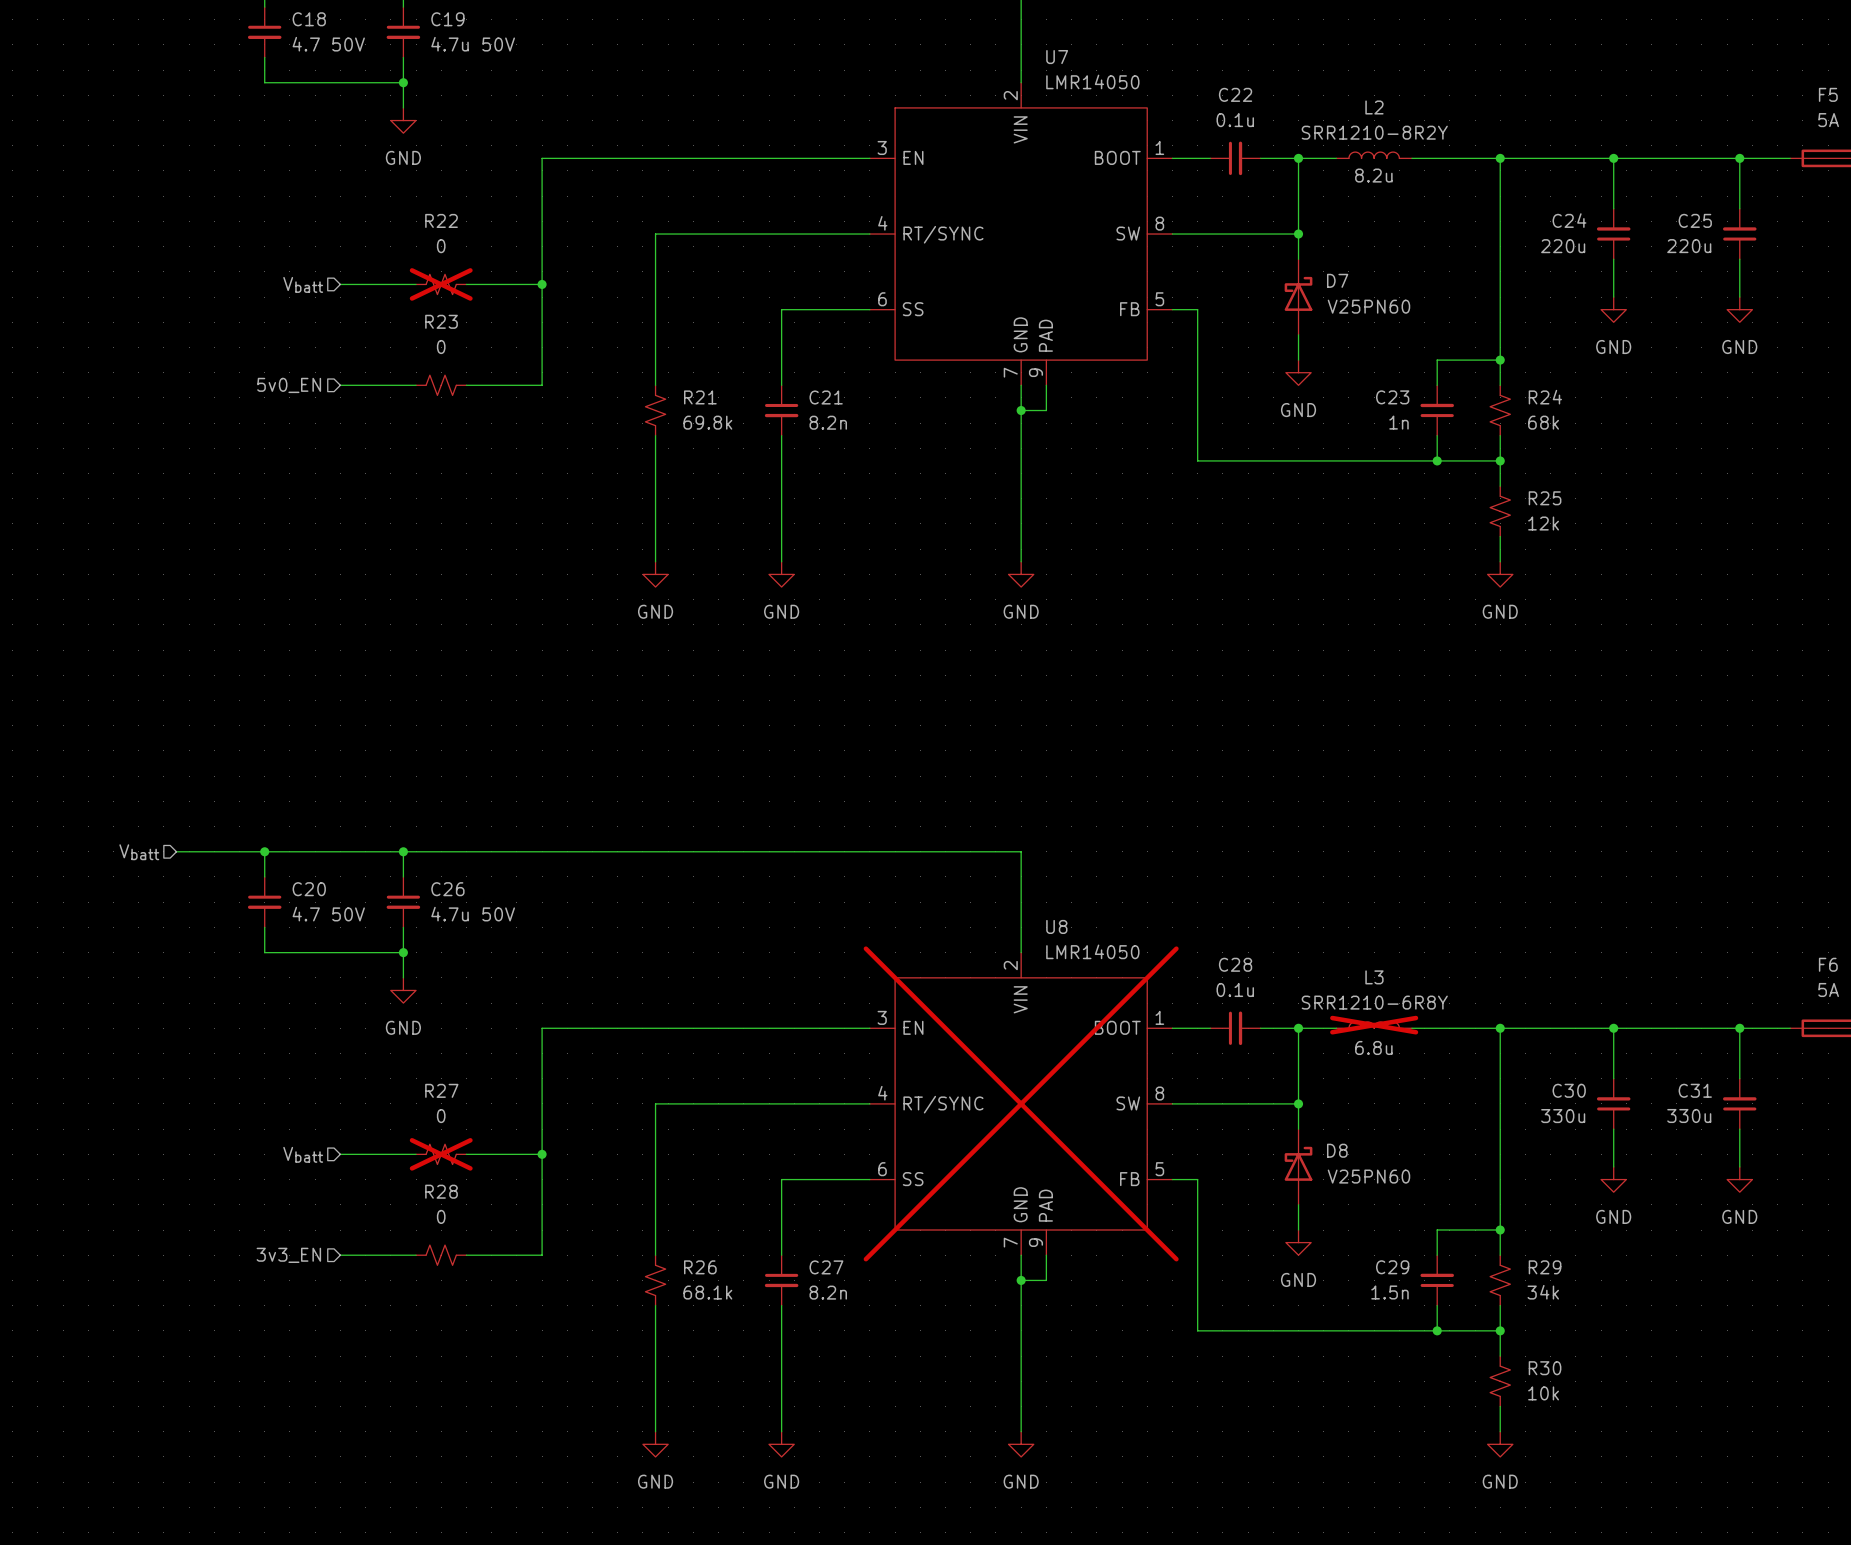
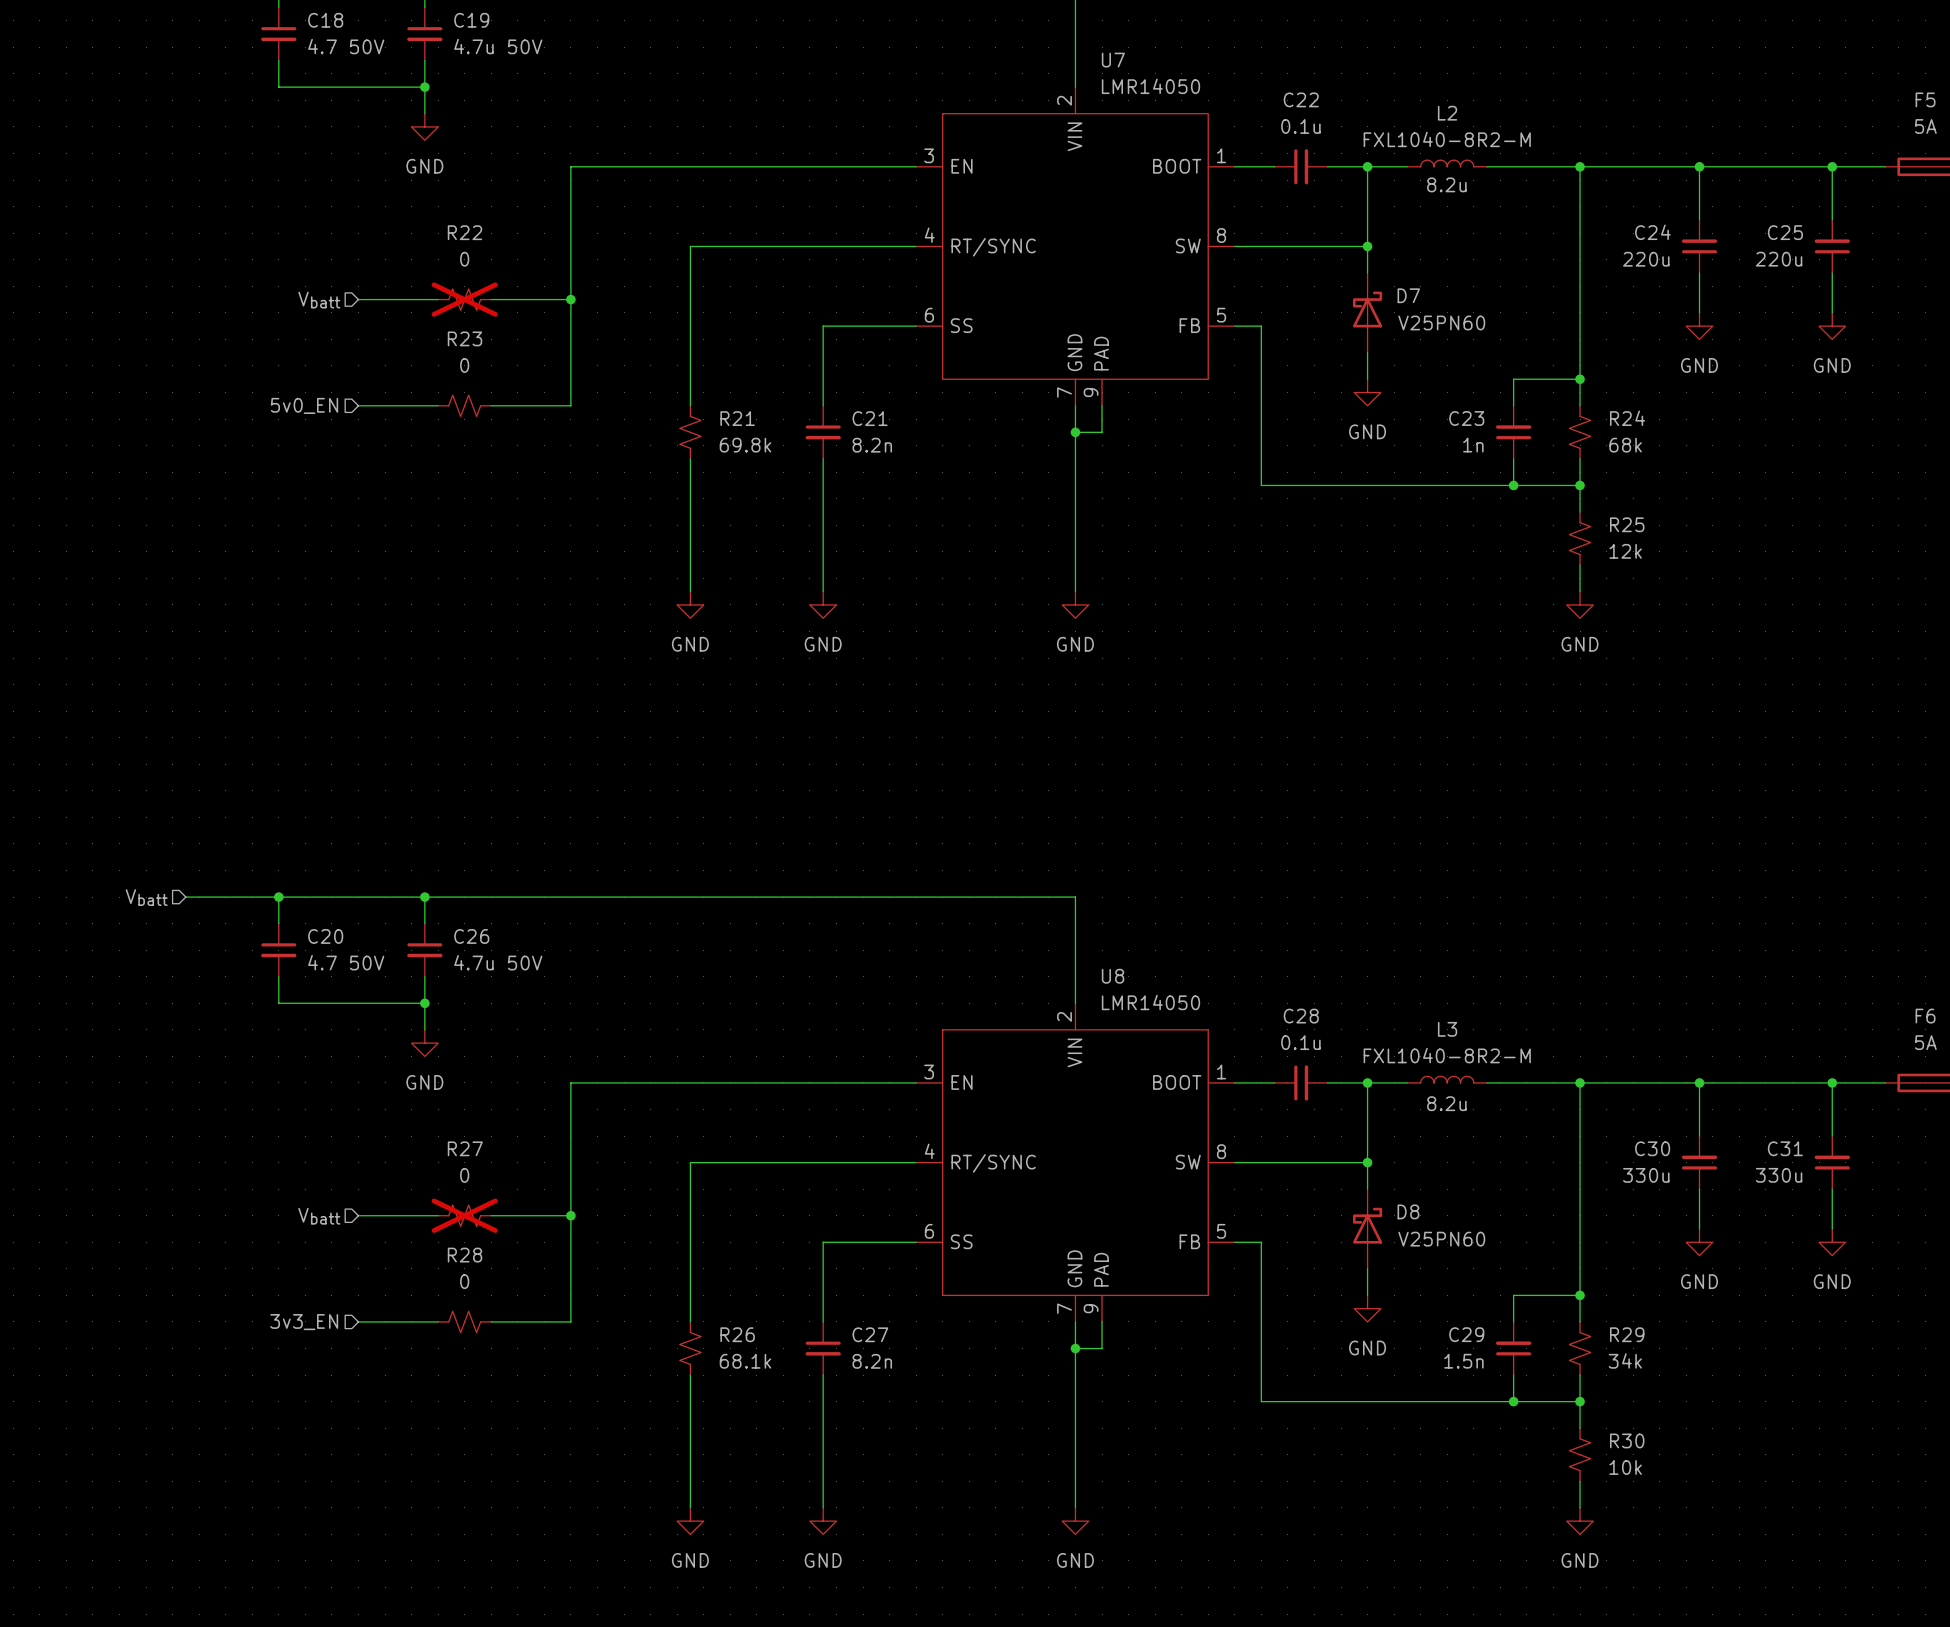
L2 value: SRR1210-8R2Y (1374, 132) -> FXL1040-8R2-M (1447, 139)
L3 value: SRR1210-6R8Y (1374, 1002) -> FXL1040-8R2-M (1447, 1055)
L3 do-not-place cross: (1374, 1025) -> none
L3 text: 6.8u (1373, 1047) -> 8.2u (1446, 1103)
U8 do-not-place cross: (1021, 1103) -> none

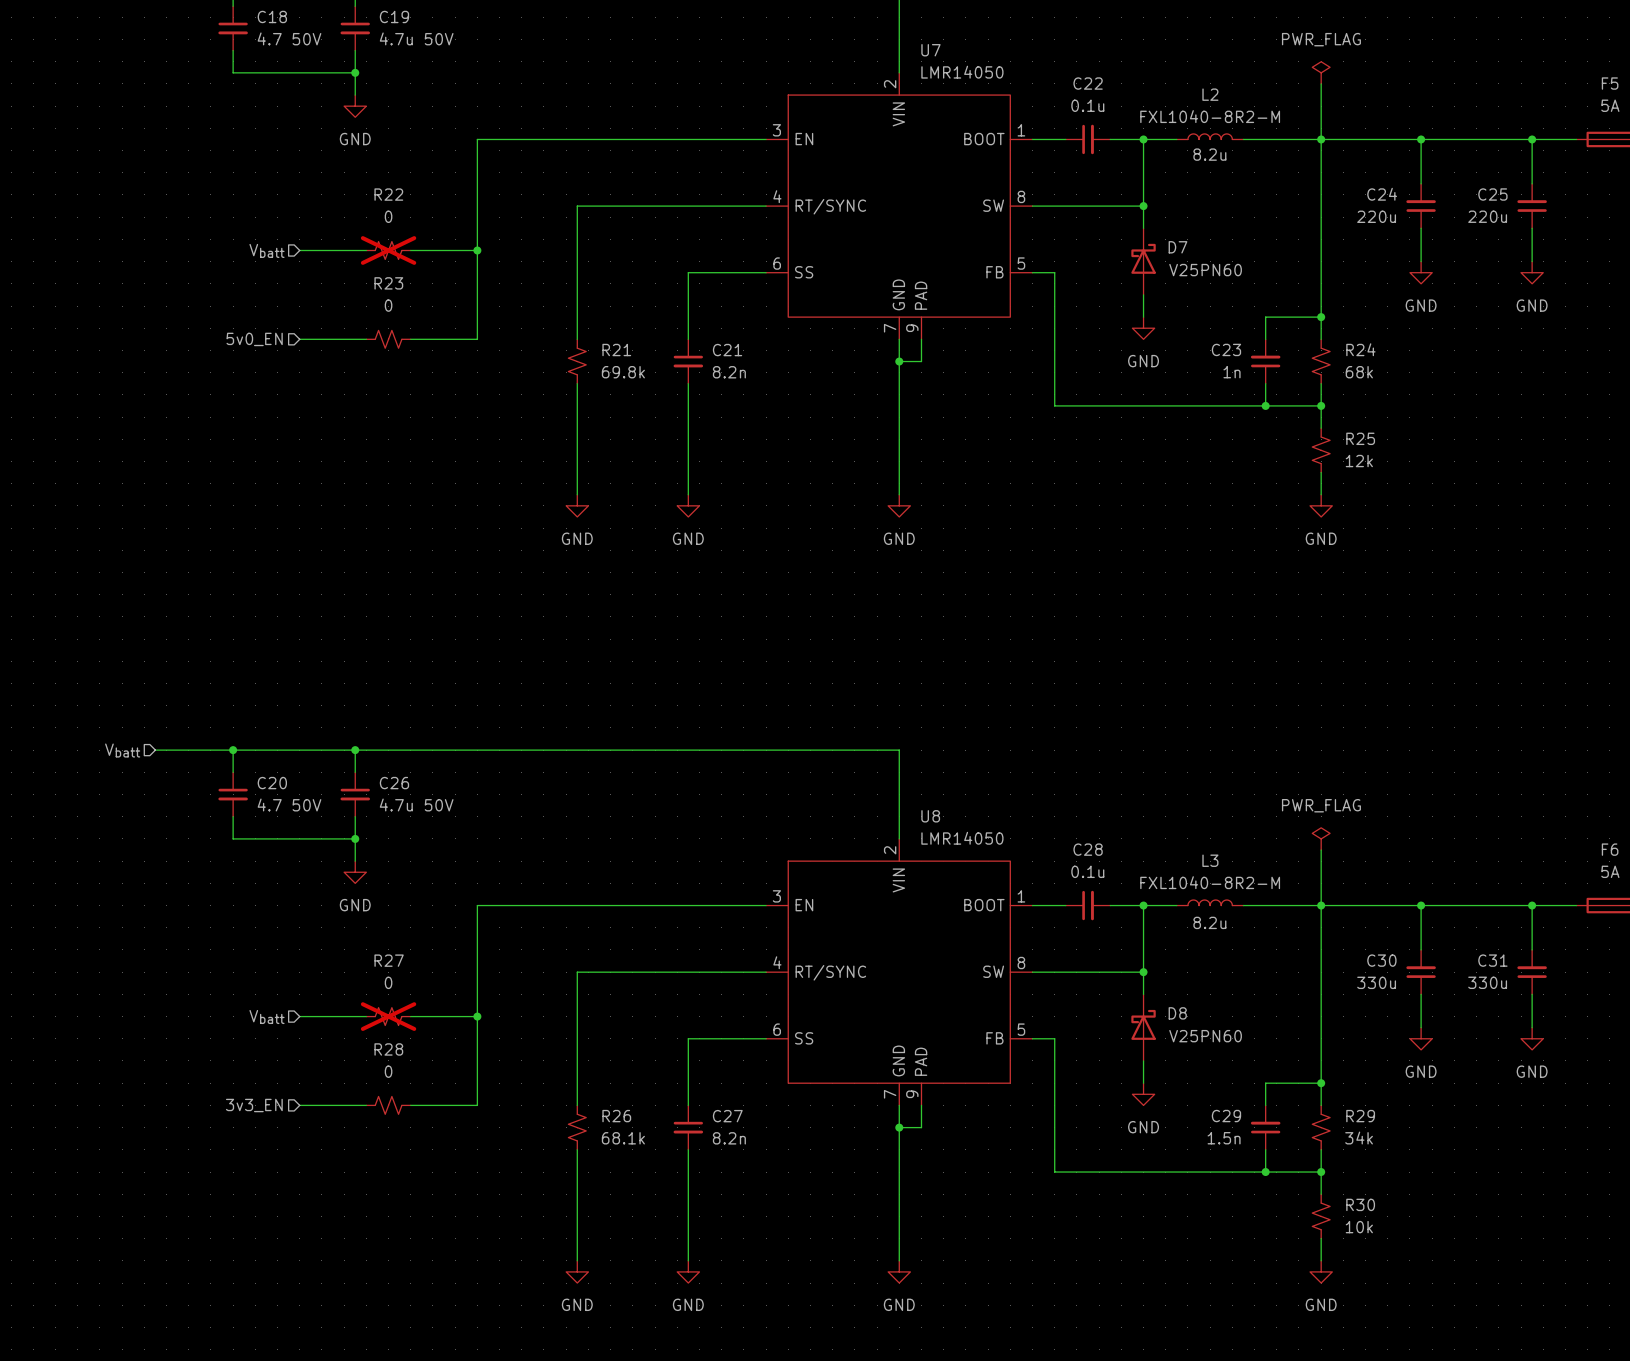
power symbol: none -> PWR_FLAG (1321, 72)
wire: none -> (1321, 83) (1321, 139)
power symbol: none -> PWR_FLAG (1321, 838)
wire: none -> (1321, 850) (1321, 905)

